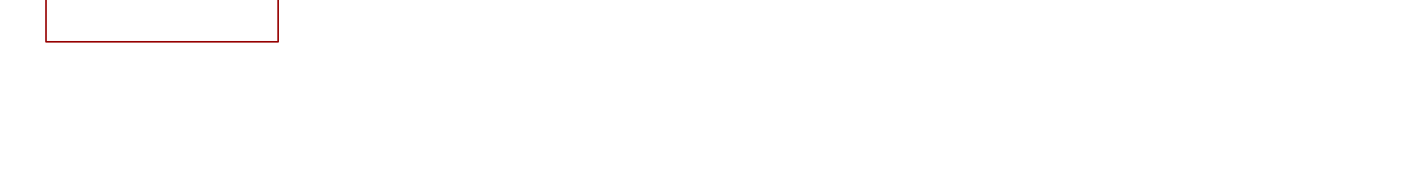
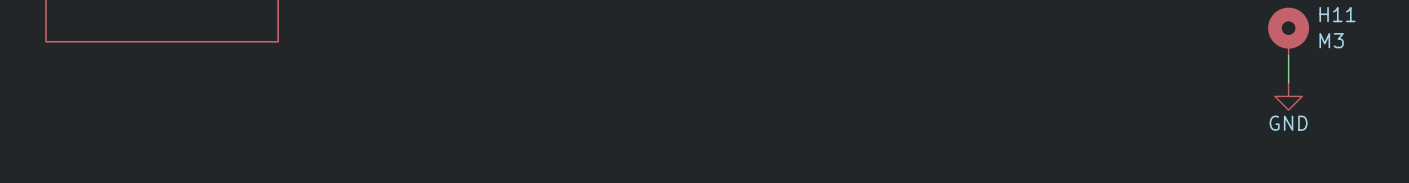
H11: none -> M3 (1288, 31)
wire: none -> (1288, 55) (1288, 82)
power symbol: none -> GND (1288, 96)

